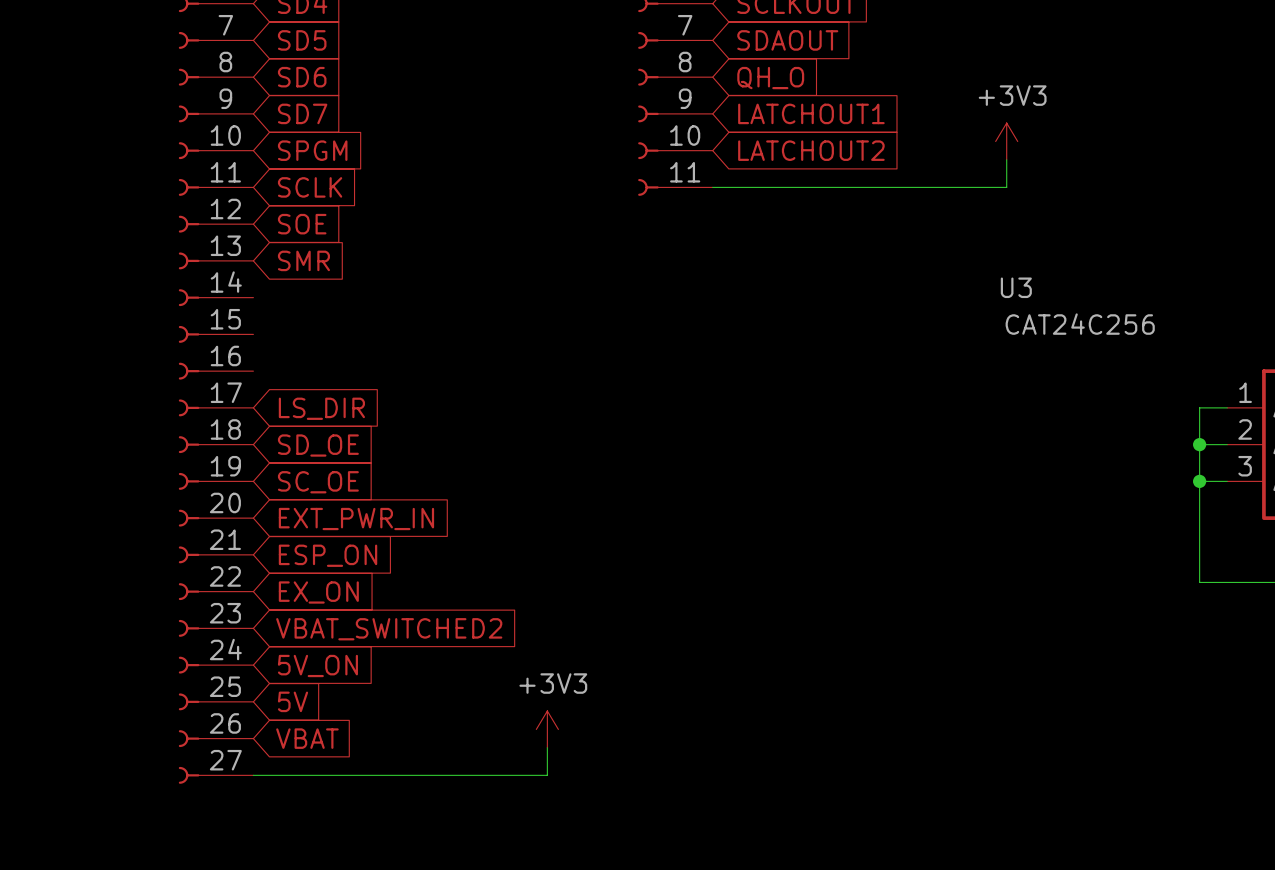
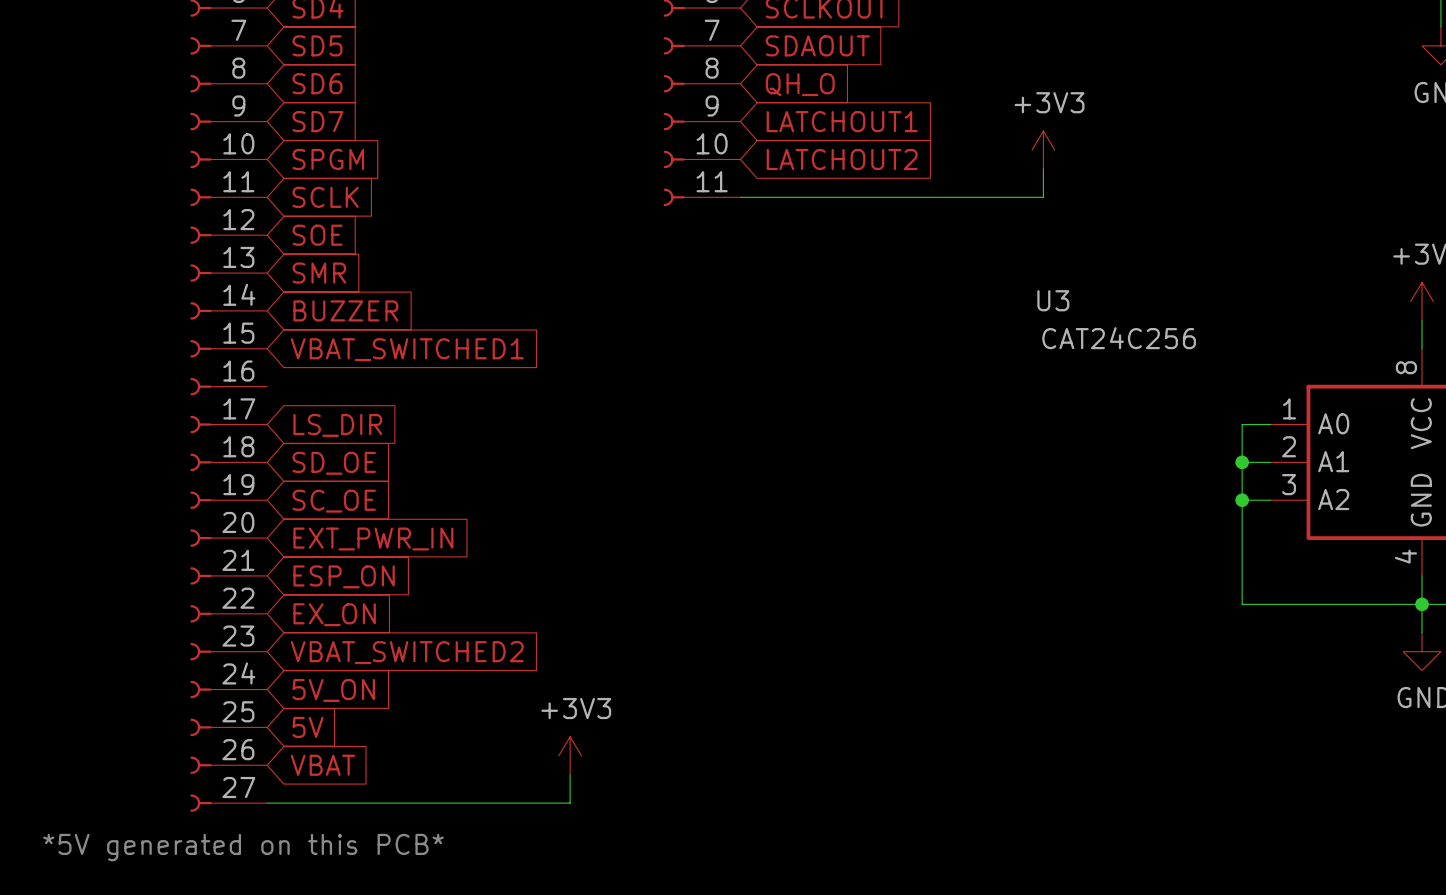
global label: none -> BUZZER (345, 310)
global label: none -> VBAT_SWITCHED1 (407, 349)
text: none -> *5V generated on this PCB* (243, 847)

